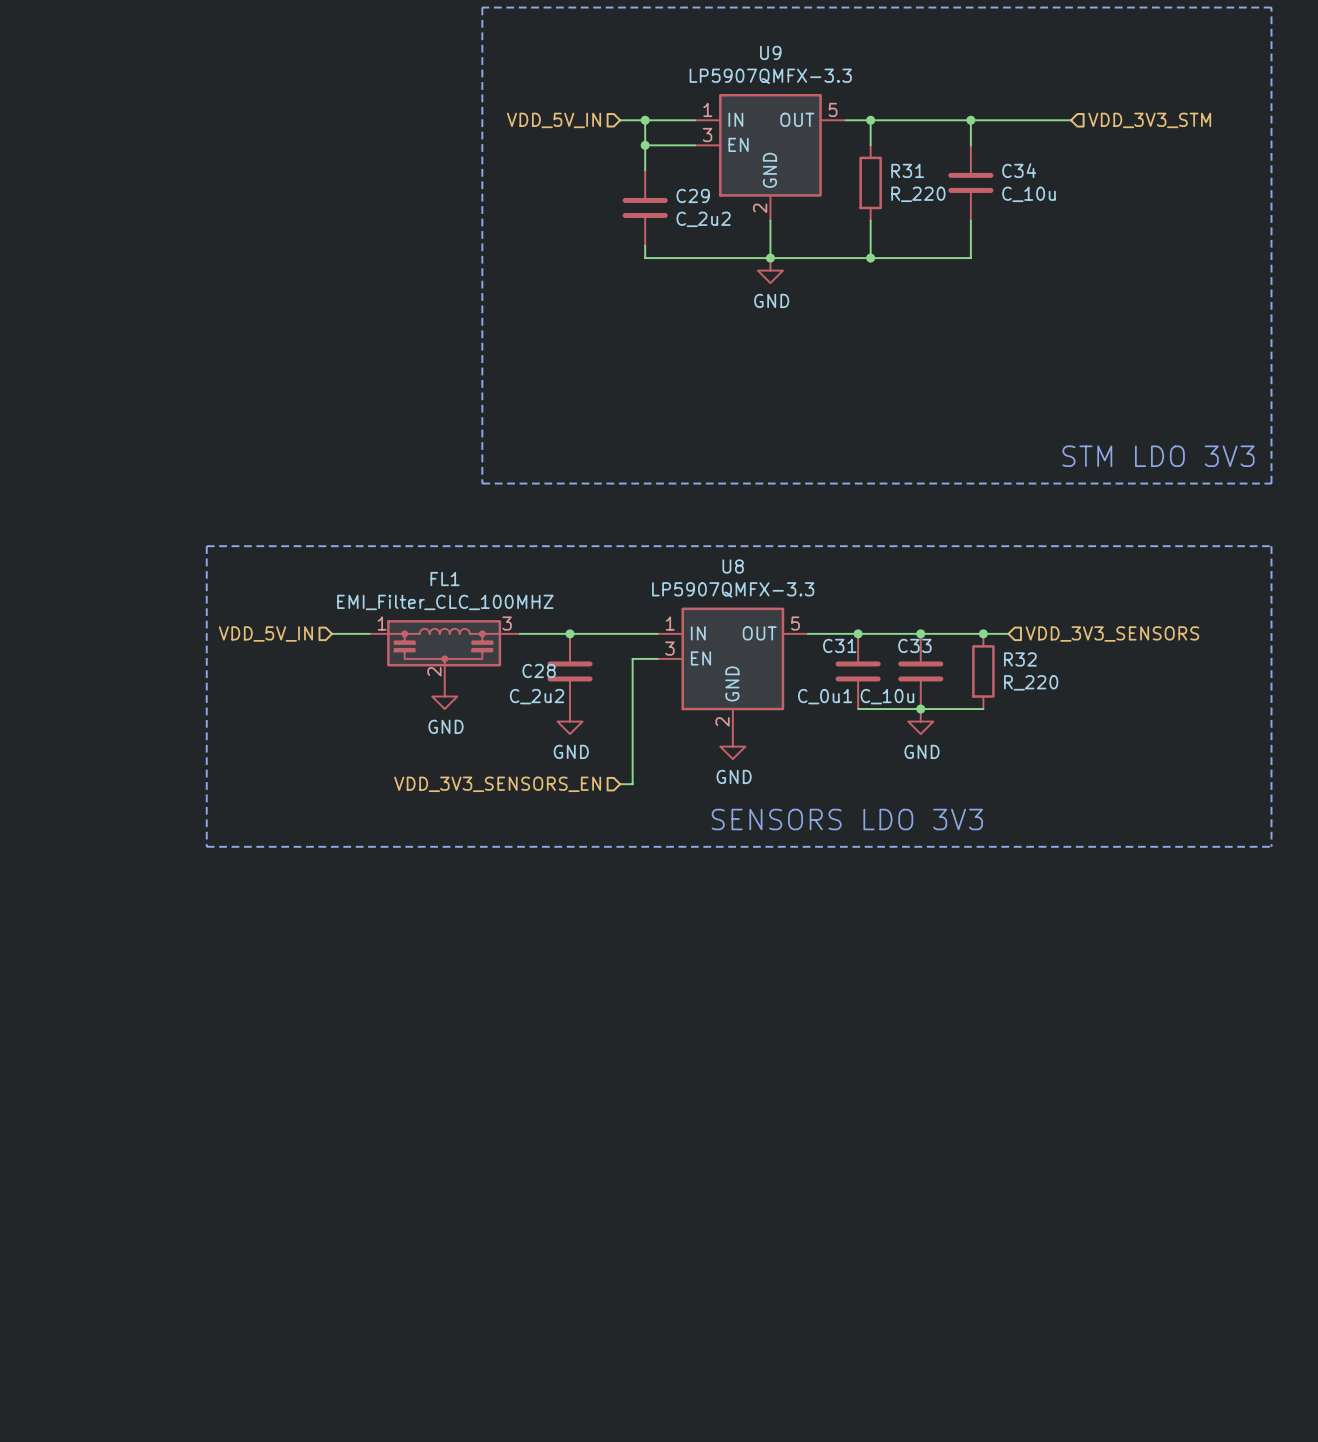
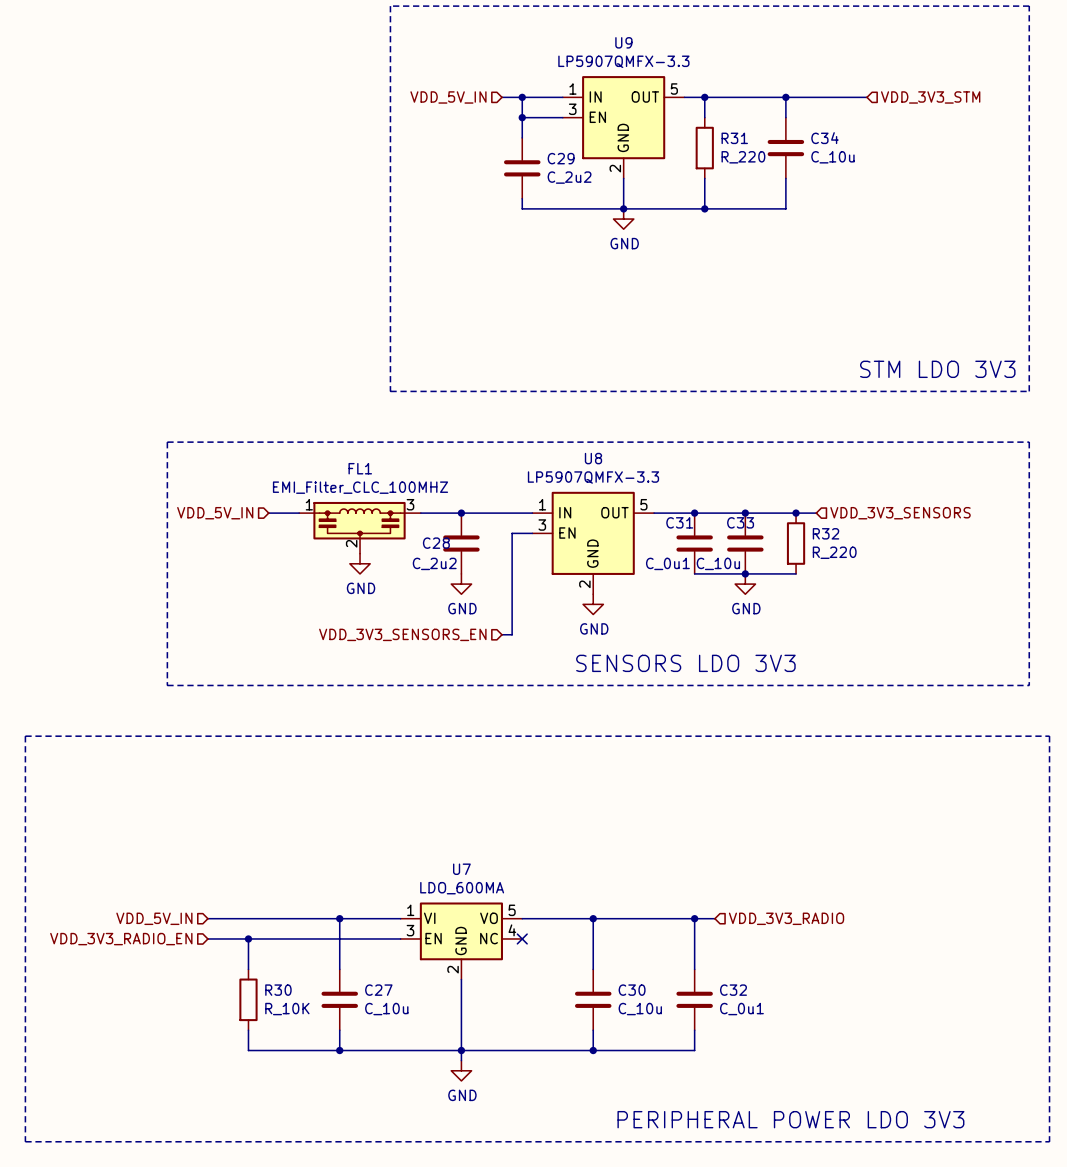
line: none -> (25, 736) (25, 1141) (1049, 1141) (1049, 736) (25, 736)
wire: none -> (207, 918) (400, 918)
wire: none -> (339, 918) (339, 969)
junction: none -> (339, 918)
wire: none -> (522, 918) (714, 918)
wire: none -> (593, 918) (593, 969)
junction: none -> (593, 918)
wire: none -> (694, 918) (694, 969)
junction: none -> (694, 918)
hierarchical label: none -> VDD_5V_IN (154, 918)
hierarchical label: none -> VDD_3V3_RADIO (786, 918)
wire: none -> (207, 938) (400, 938)
wire: none -> (248, 938) (248, 969)
junction: none -> (248, 938)
no-connect mark: none -> (522, 938)
hierarchical label: none -> VDD_3V3_RADIO_EN (121, 939)
U7: none -> LDO_600MA (461, 941)
wire: none -> (461, 979) (461, 1060)
R30: none -> R_10K (248, 999)
C27: none -> C_10u (339, 999)
C30: none -> C_10u (593, 999)
C32: none -> C_0u1 (694, 999)
wire: none -> (248, 1030) (248, 1050) (694, 1050) (694, 1030)
wire: none -> (339, 1030) (339, 1050)
wire: none -> (593, 1030) (593, 1050)
junction: none -> (339, 1050)
junction: none -> (461, 1050)
junction: none -> (593, 1050)
power symbol: none -> GND (461, 1070)
text: none -> PERIPHERAL POWER LDO 3V3 (790, 1119)

